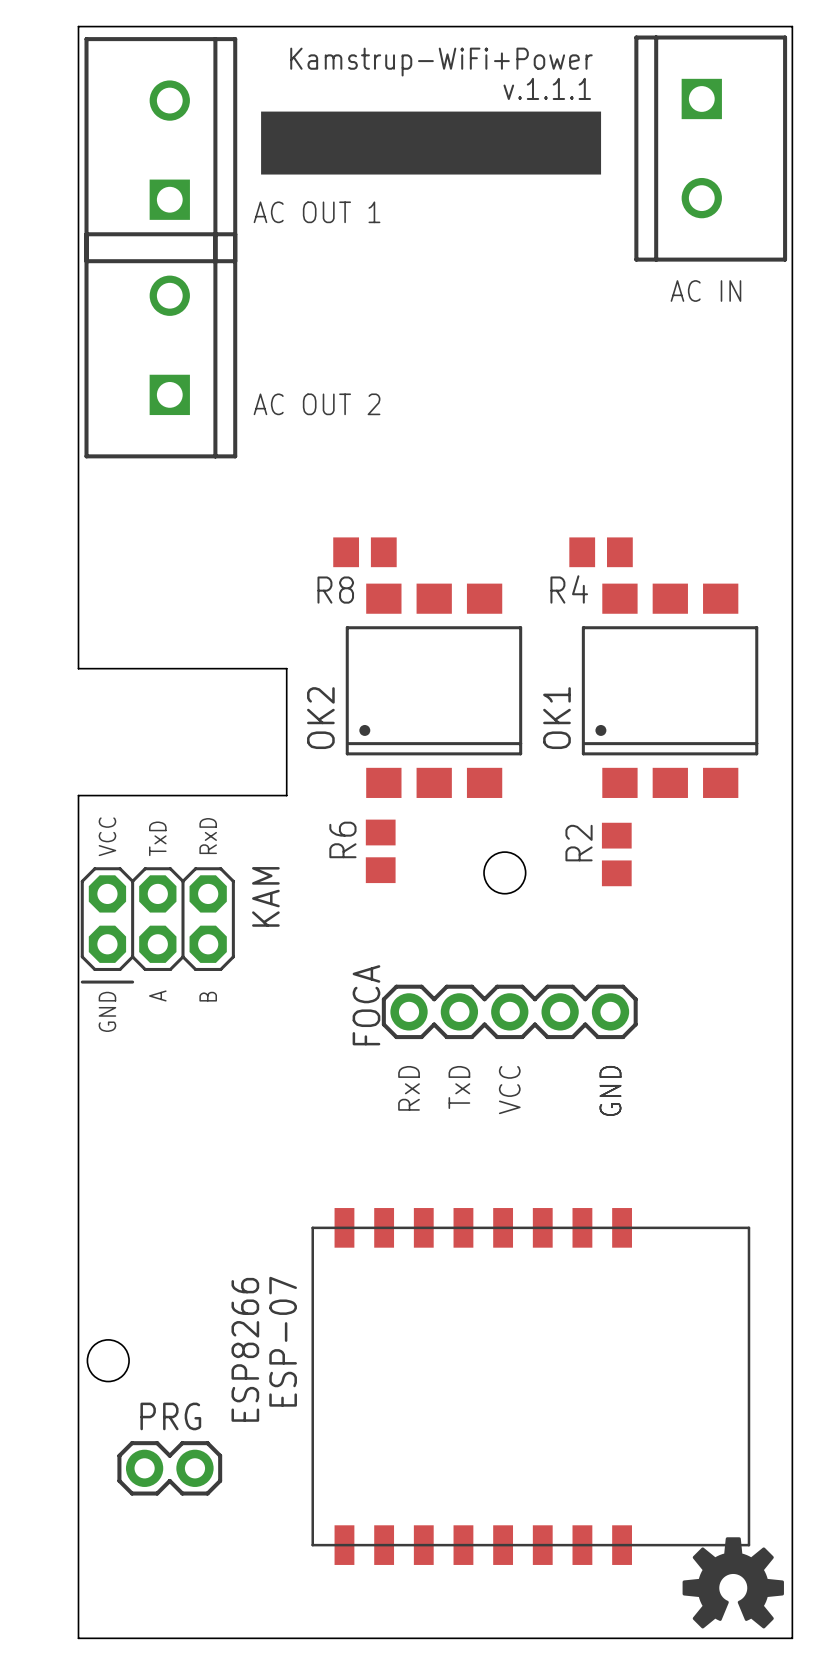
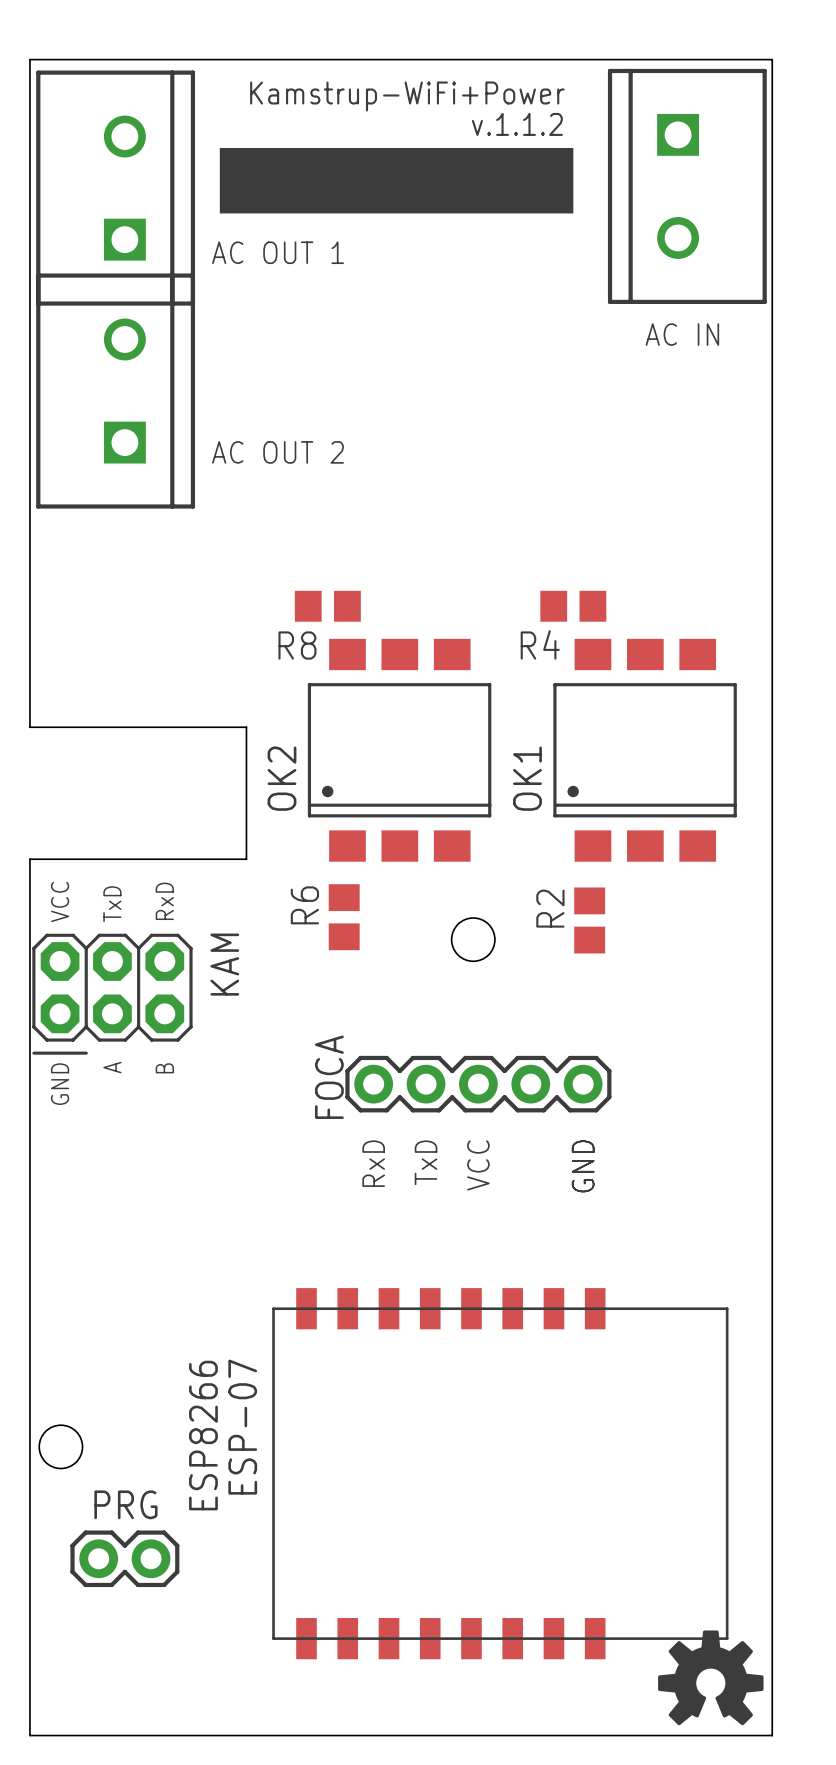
text: v.1.1.1 (547, 88) -> v.1.1.2 (517, 124)

